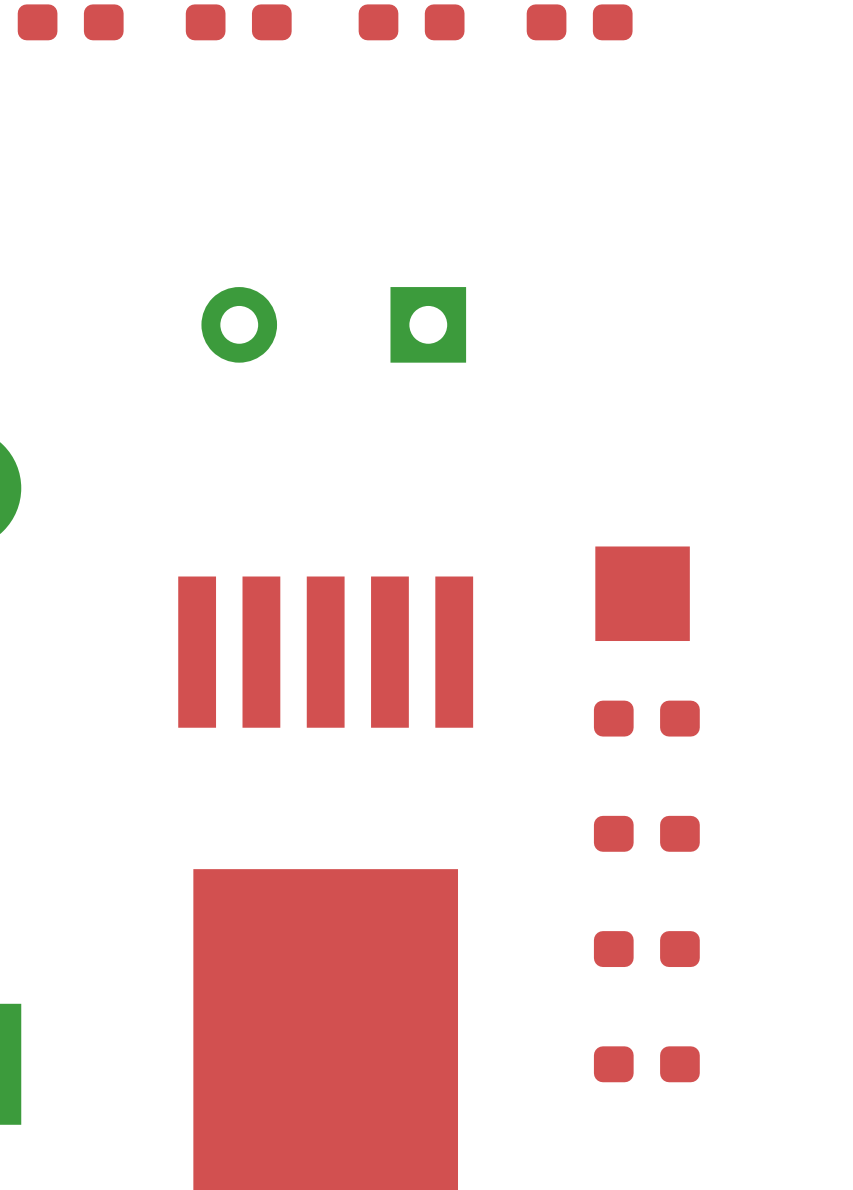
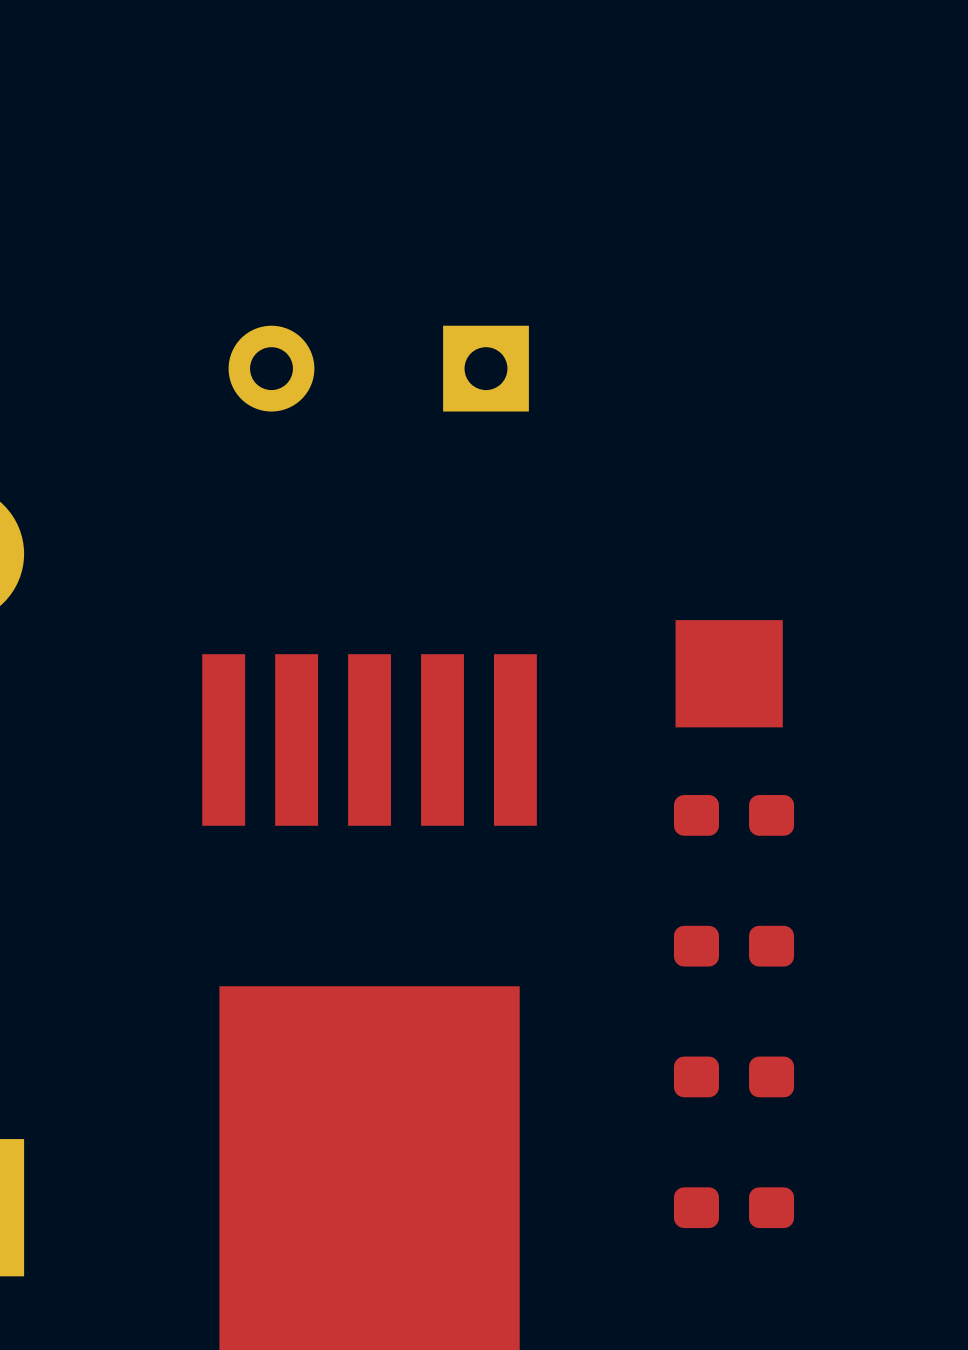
part: (70, 22) -> none
part: (238, 22) -> none
part: (411, 22) -> none
part: (579, 22) -> none

